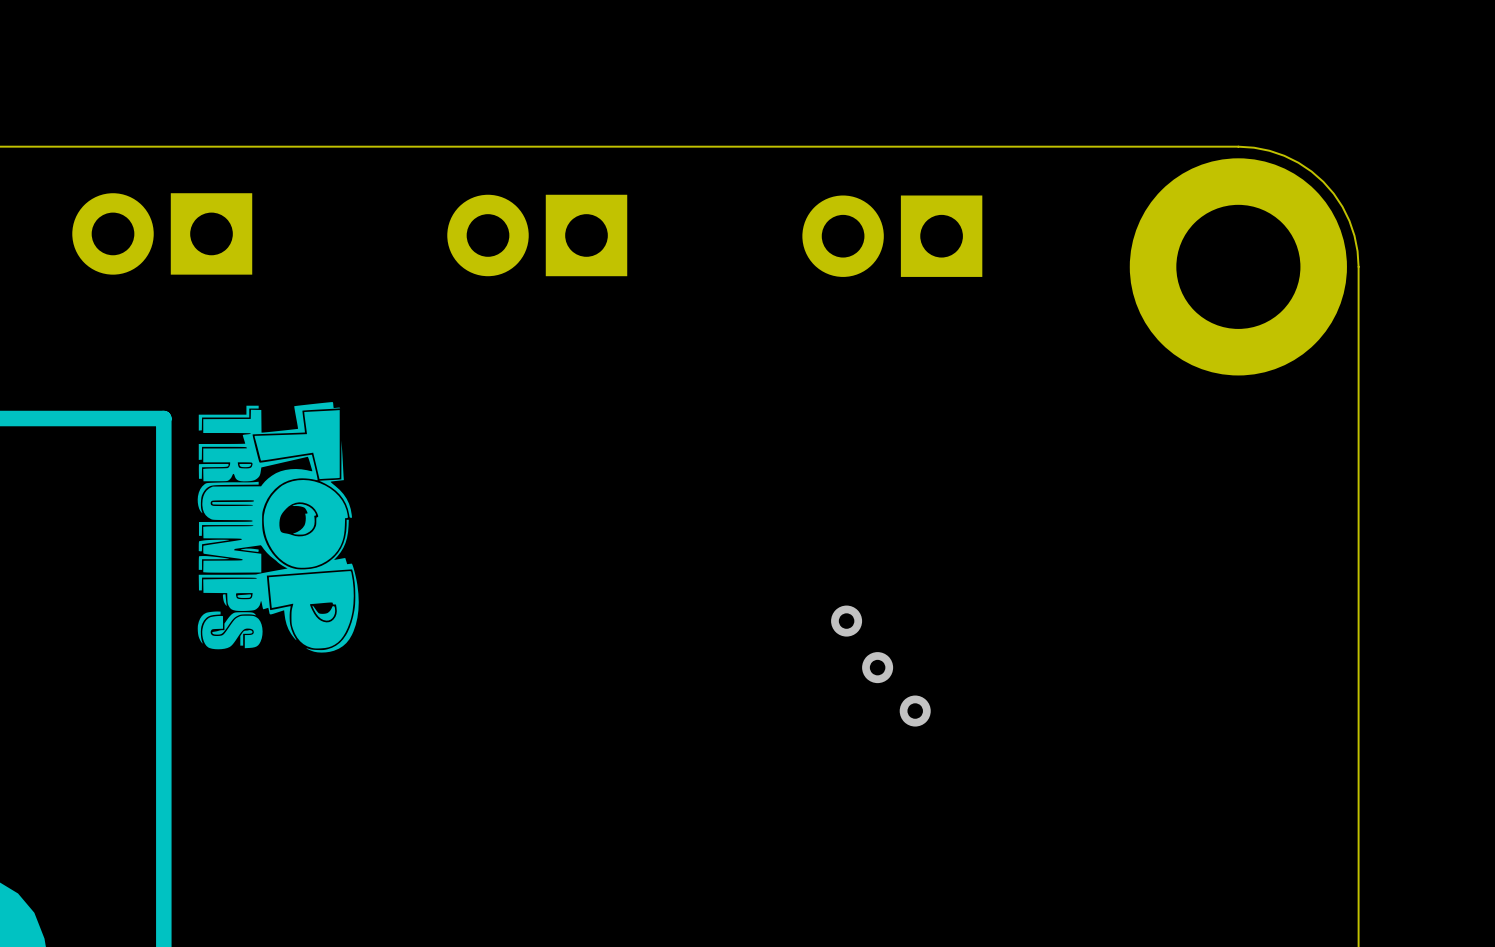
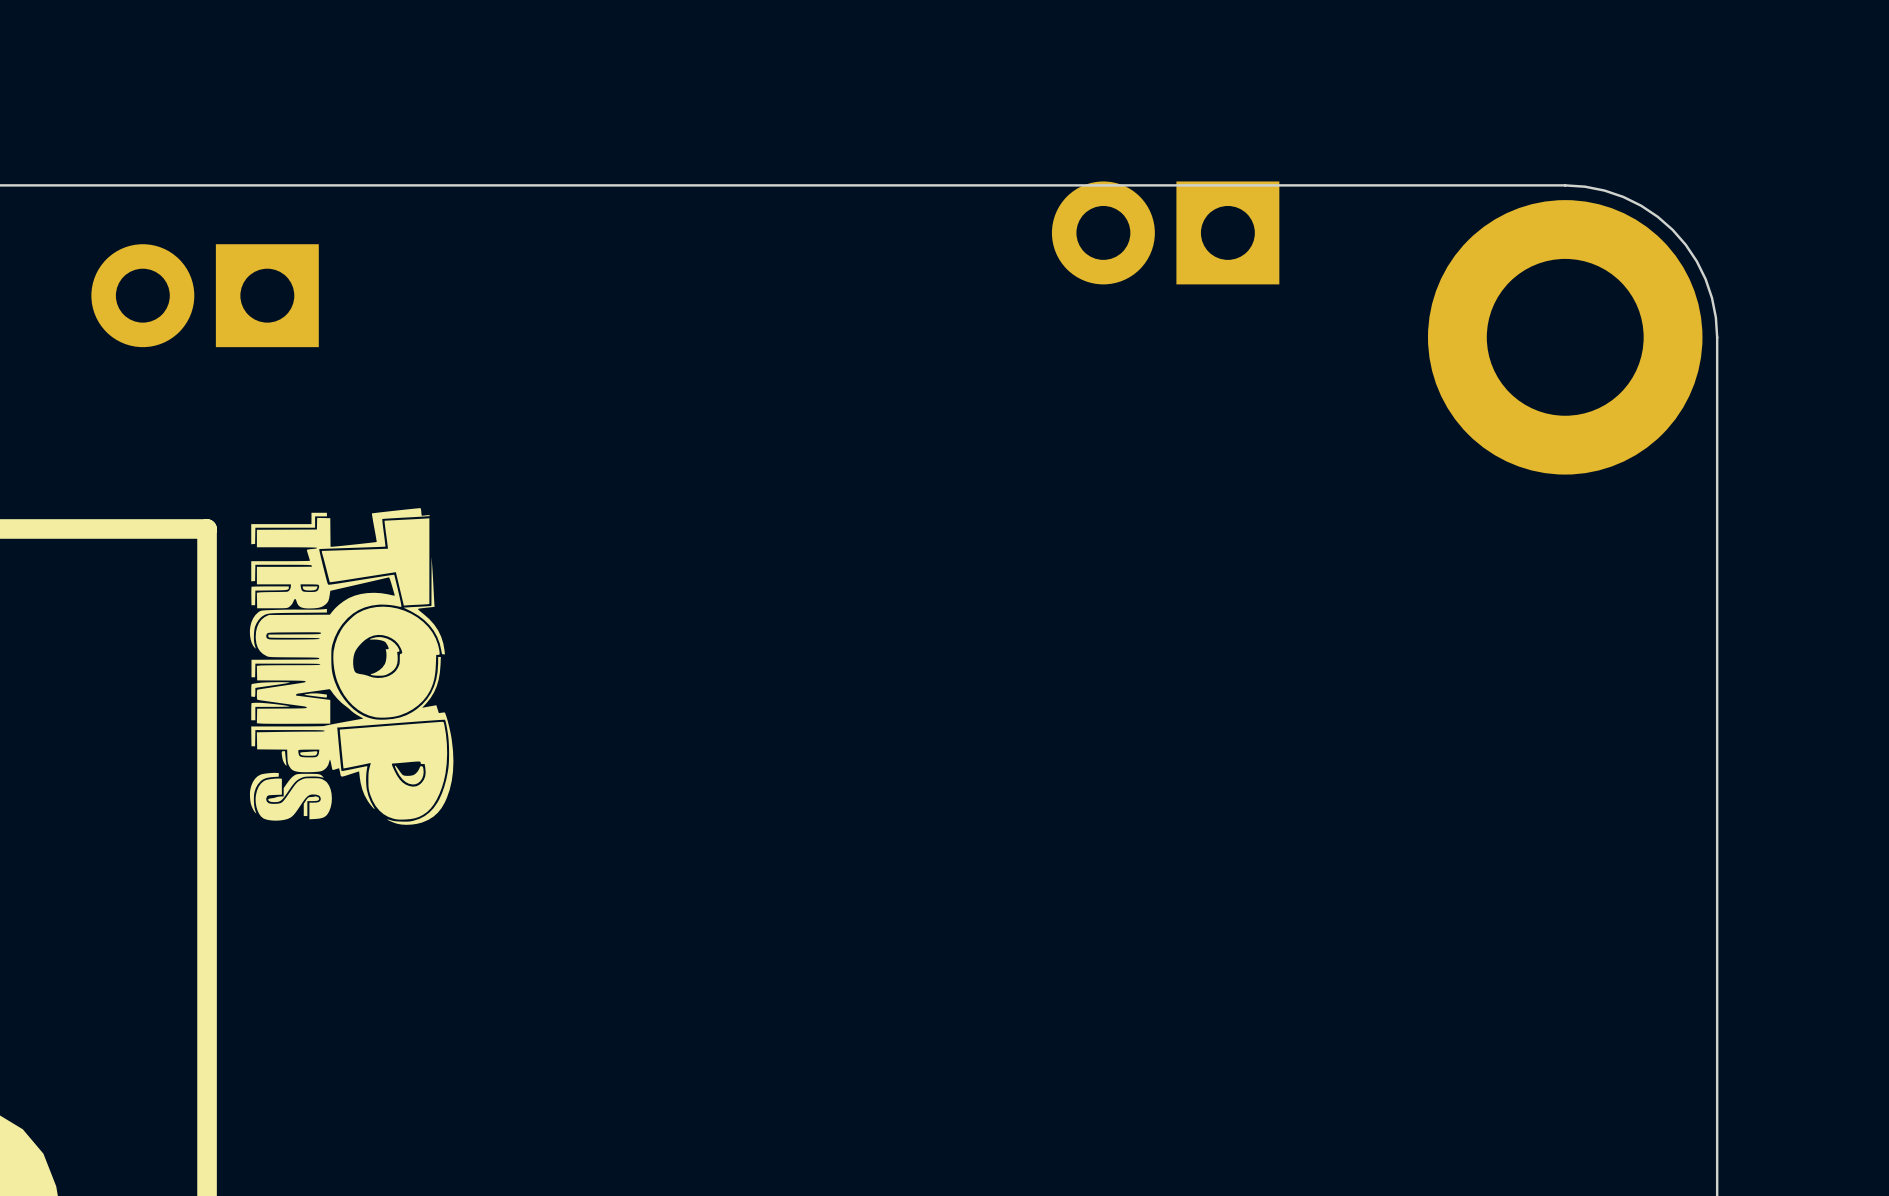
part: (537, 235) -> none
part position: (892, 236) -> (1165, 232)
via: (846, 621) -> none
via: (877, 667) -> none
via: (915, 711) -> none

